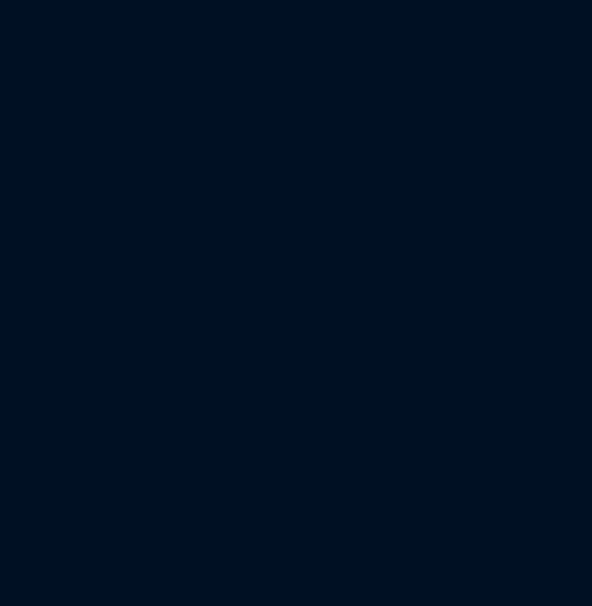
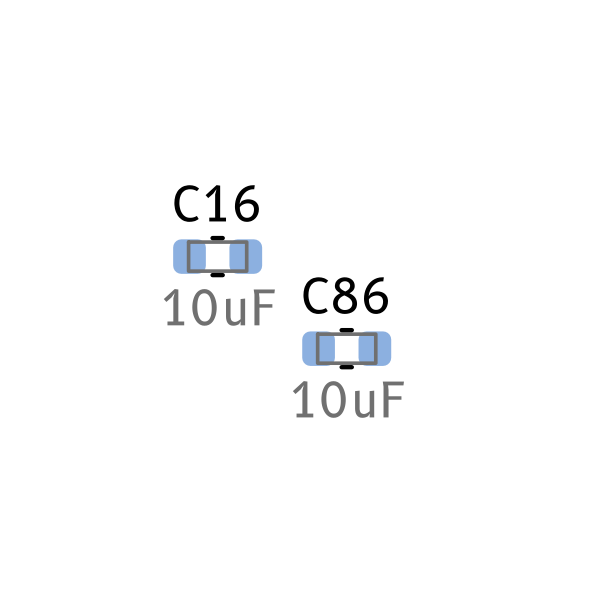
C16: none -> 10uF (217, 256)
C86: none -> 10uF (346, 348)

